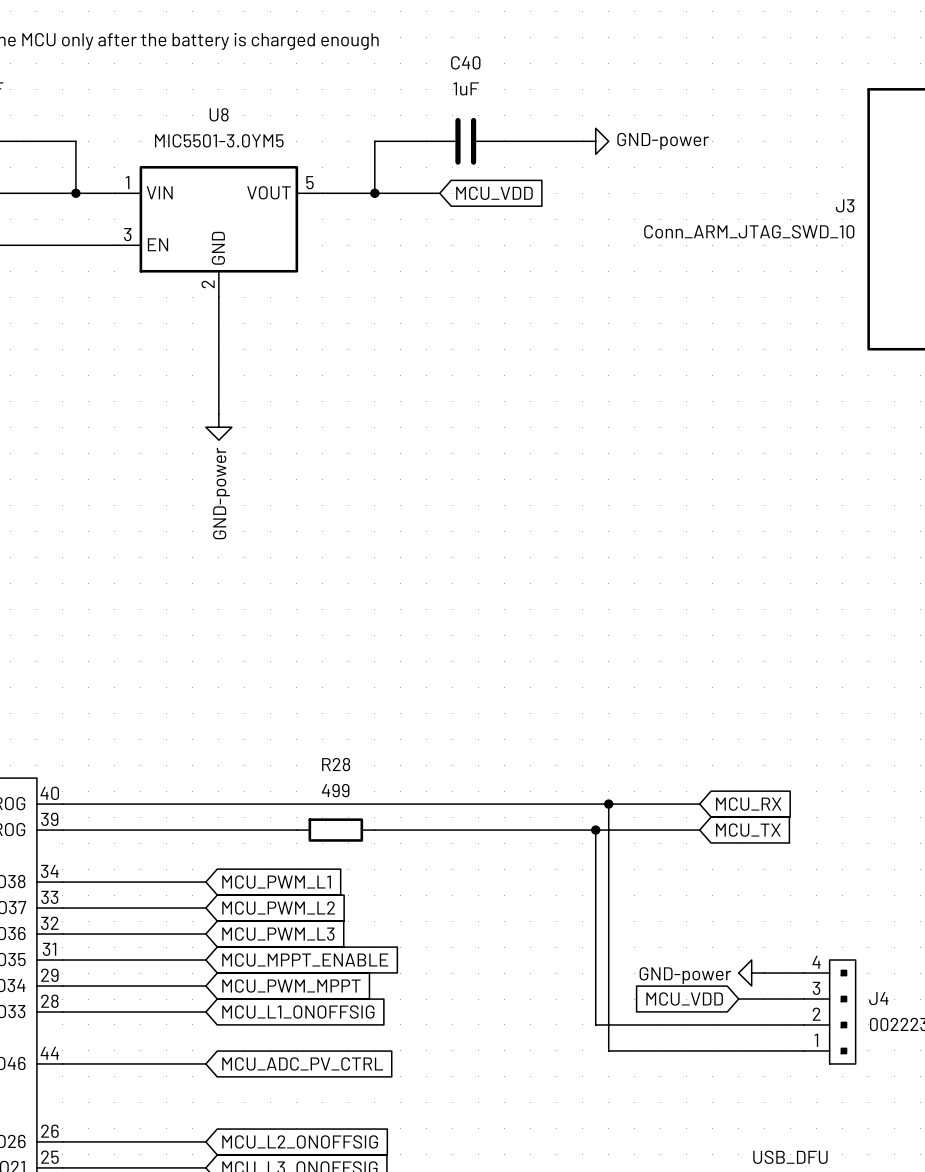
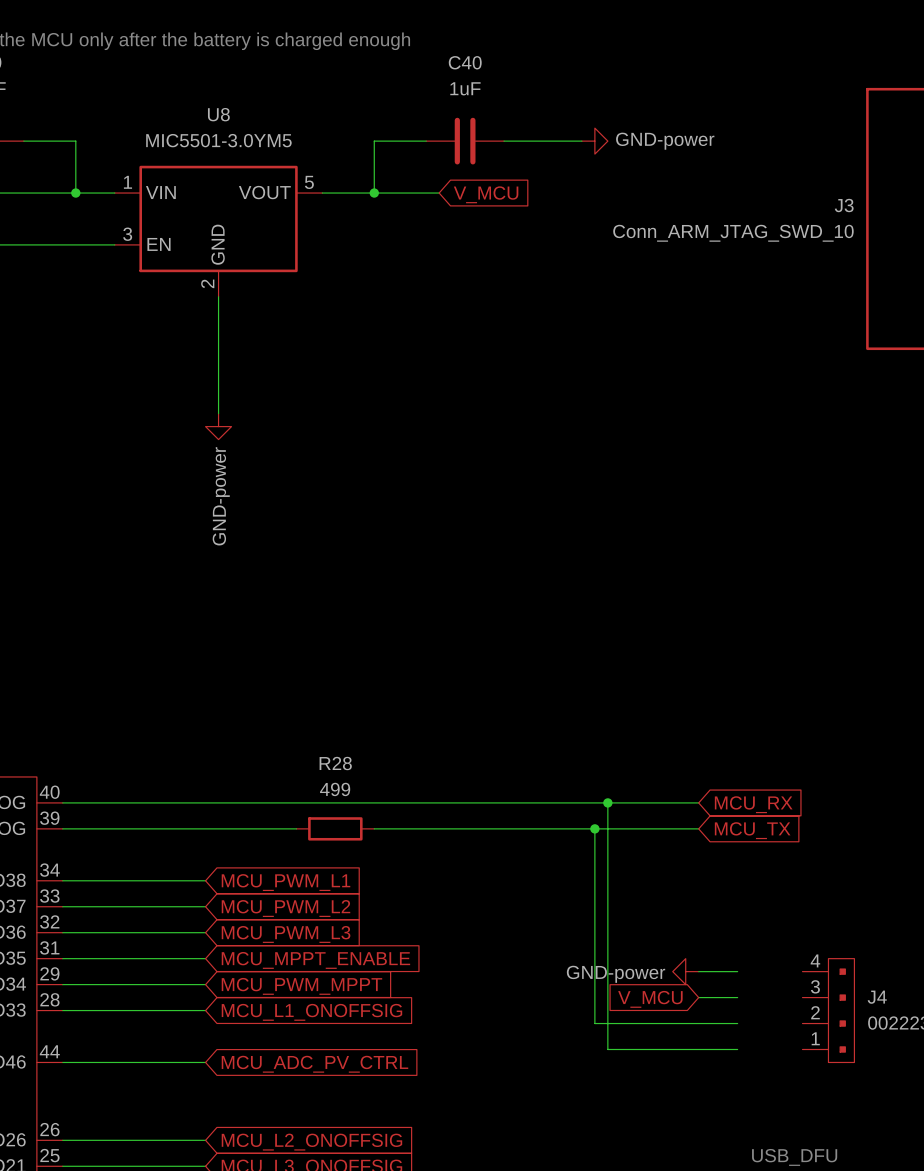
global label: MCU_VDD (494, 193) -> V_MCU (486, 194)
power symbol position: GND-power (751, 973) -> GND-power (685, 971)
wire: (764, 973) (803, 973) -> (698, 971) (737, 971)
global label: none -> V_MCU (650, 999)
global label: MCU_VDD (684, 999) -> none
wire: (738, 999) (803, 999) -> (737, 997) (698, 997)
wire: (738, 1024) (803, 1024) -> none
wire: (738, 1050) (803, 1050) -> none

